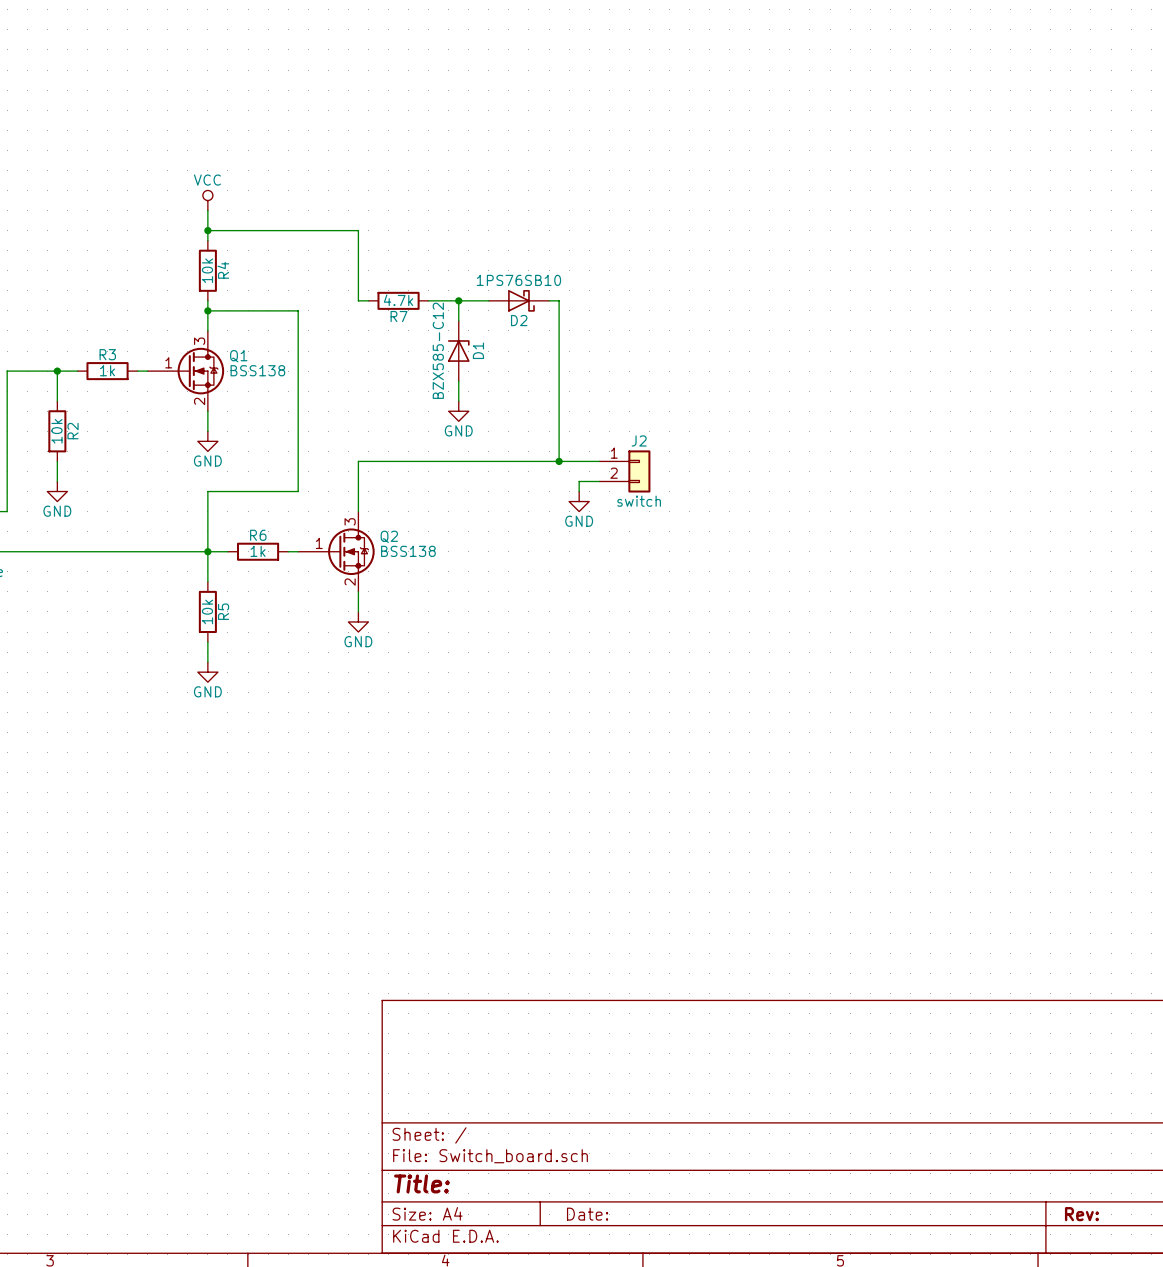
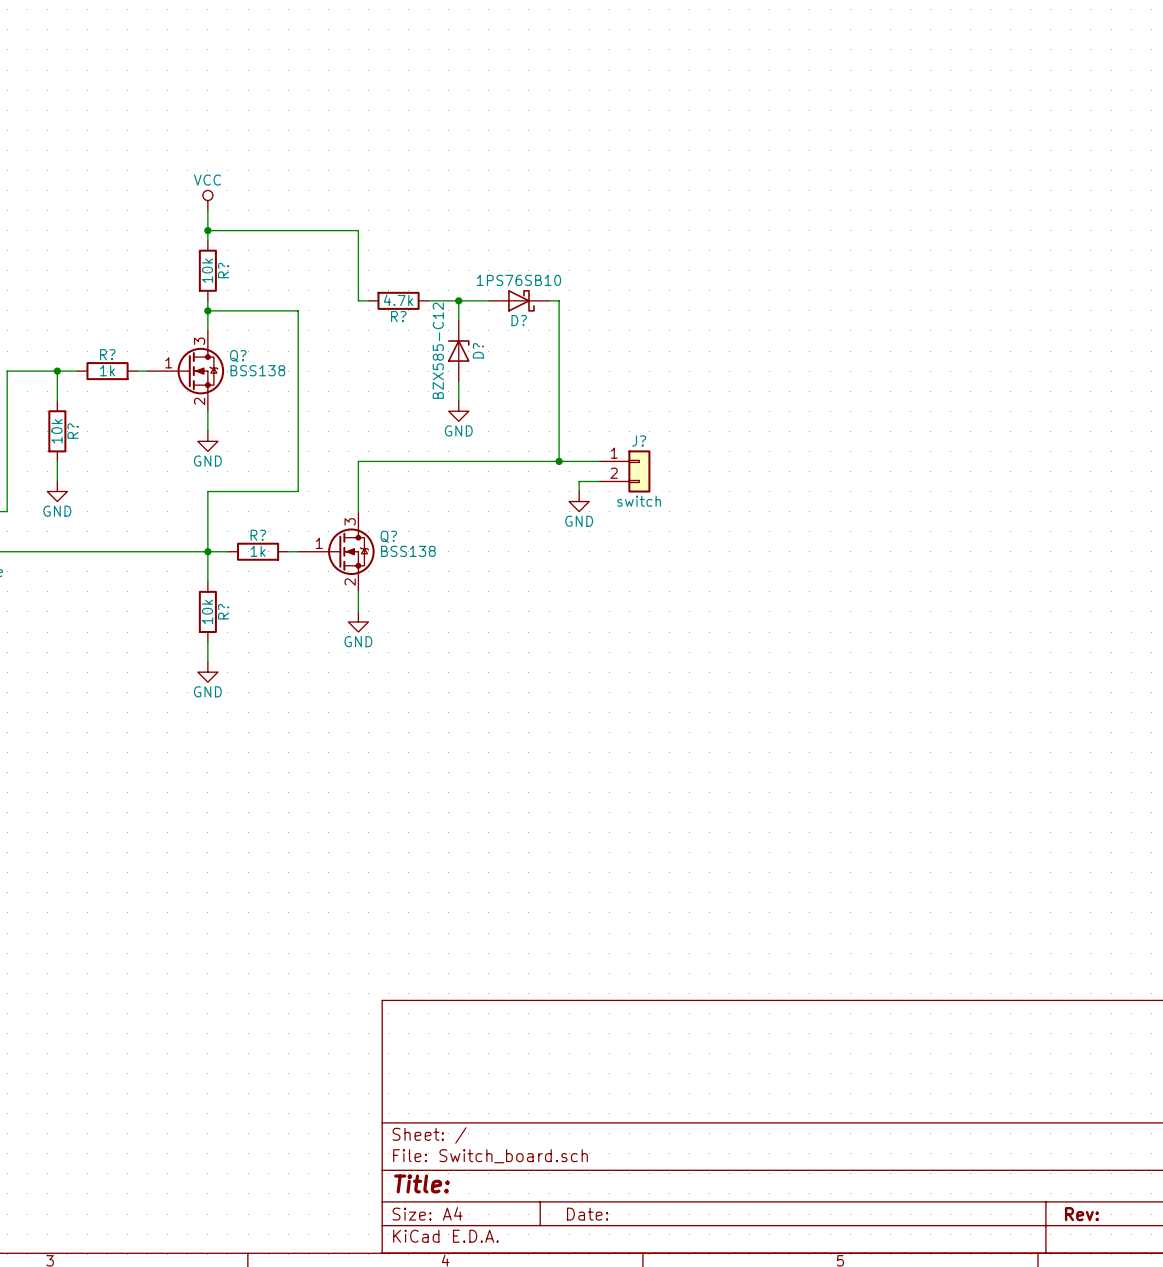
R4 name: R4 (223, 270) -> R? (223, 270)
R7 name: R7 (399, 316) -> R? (398, 316)
D2 name: D2 (519, 320) -> D? (519, 320)
D1 name: D1 (478, 350) -> D? (478, 350)
R3 name: R3 (107, 354) -> R? (107, 354)
Q1 name: Q1 (238, 356) -> Q? (238, 356)
R2 name: R2 (73, 431) -> R? (73, 431)
J2 name: J2 (639, 440) -> J? (639, 440)
R6 name: R6 (258, 535) -> R? (258, 535)
Q2 name: Q2 (389, 536) -> Q? (388, 536)
R5 name: R5 (223, 611) -> R? (223, 611)

